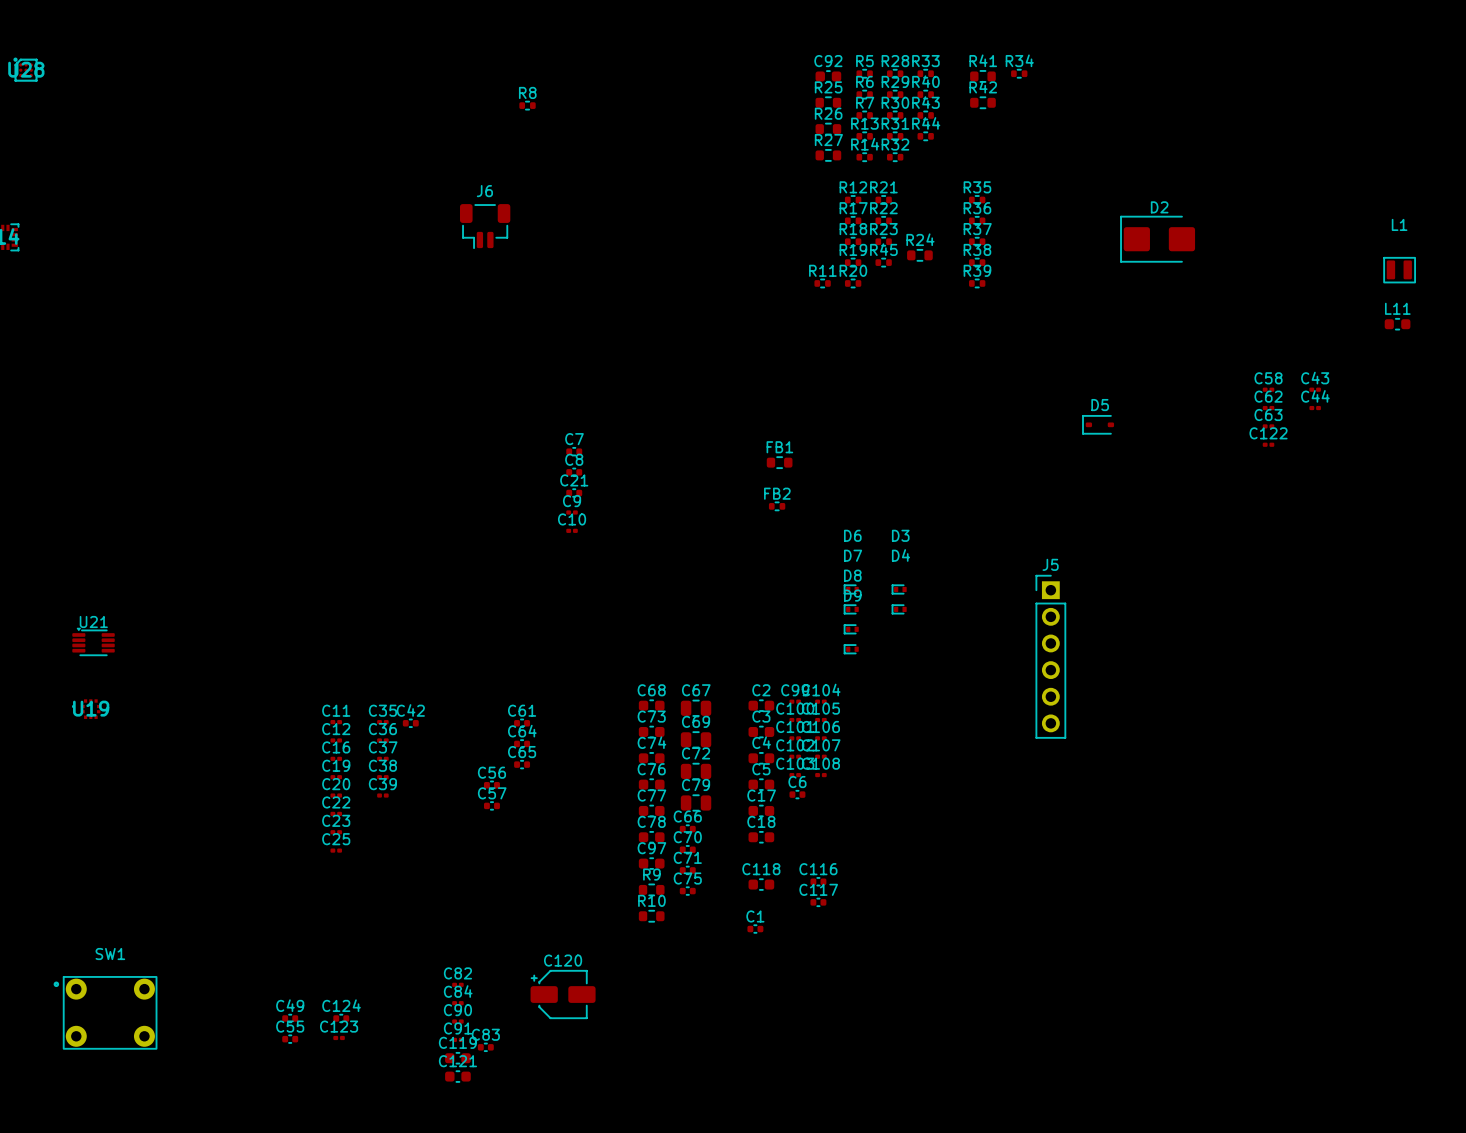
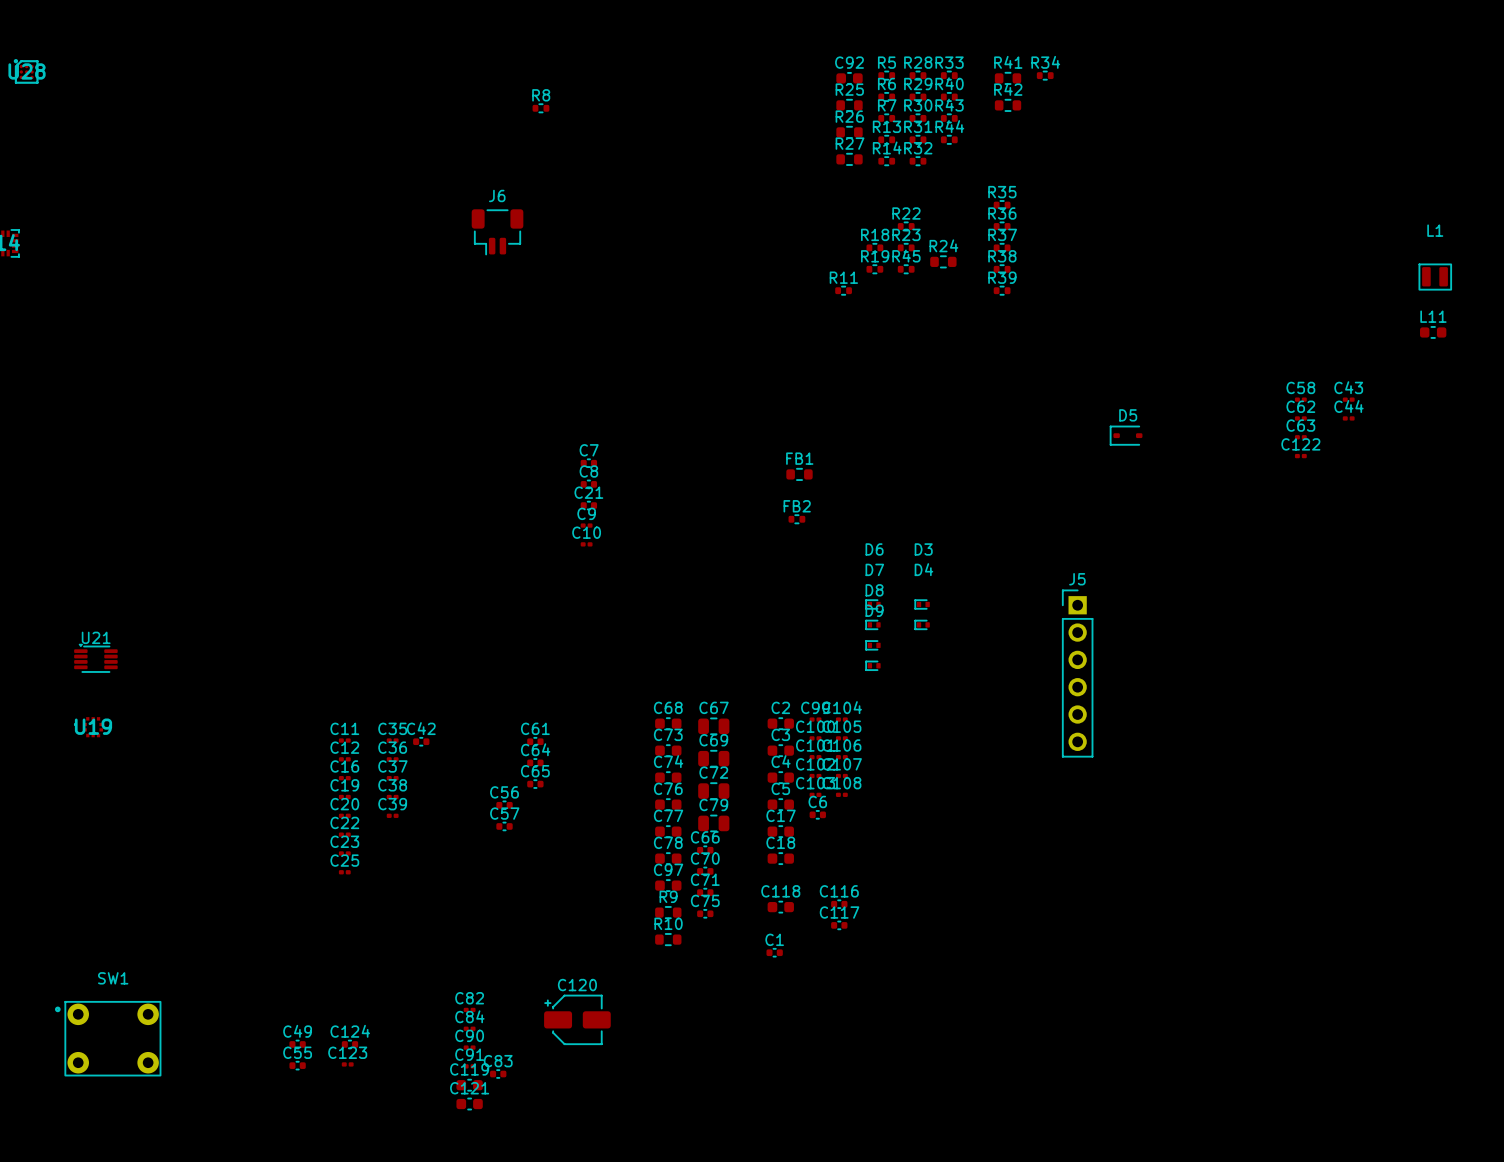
R12: (853, 199) -> none
R21: (883, 199) -> none
R17: (853, 220) -> none
D2: (1157, 239) -> none
R20: (853, 283) -> none

